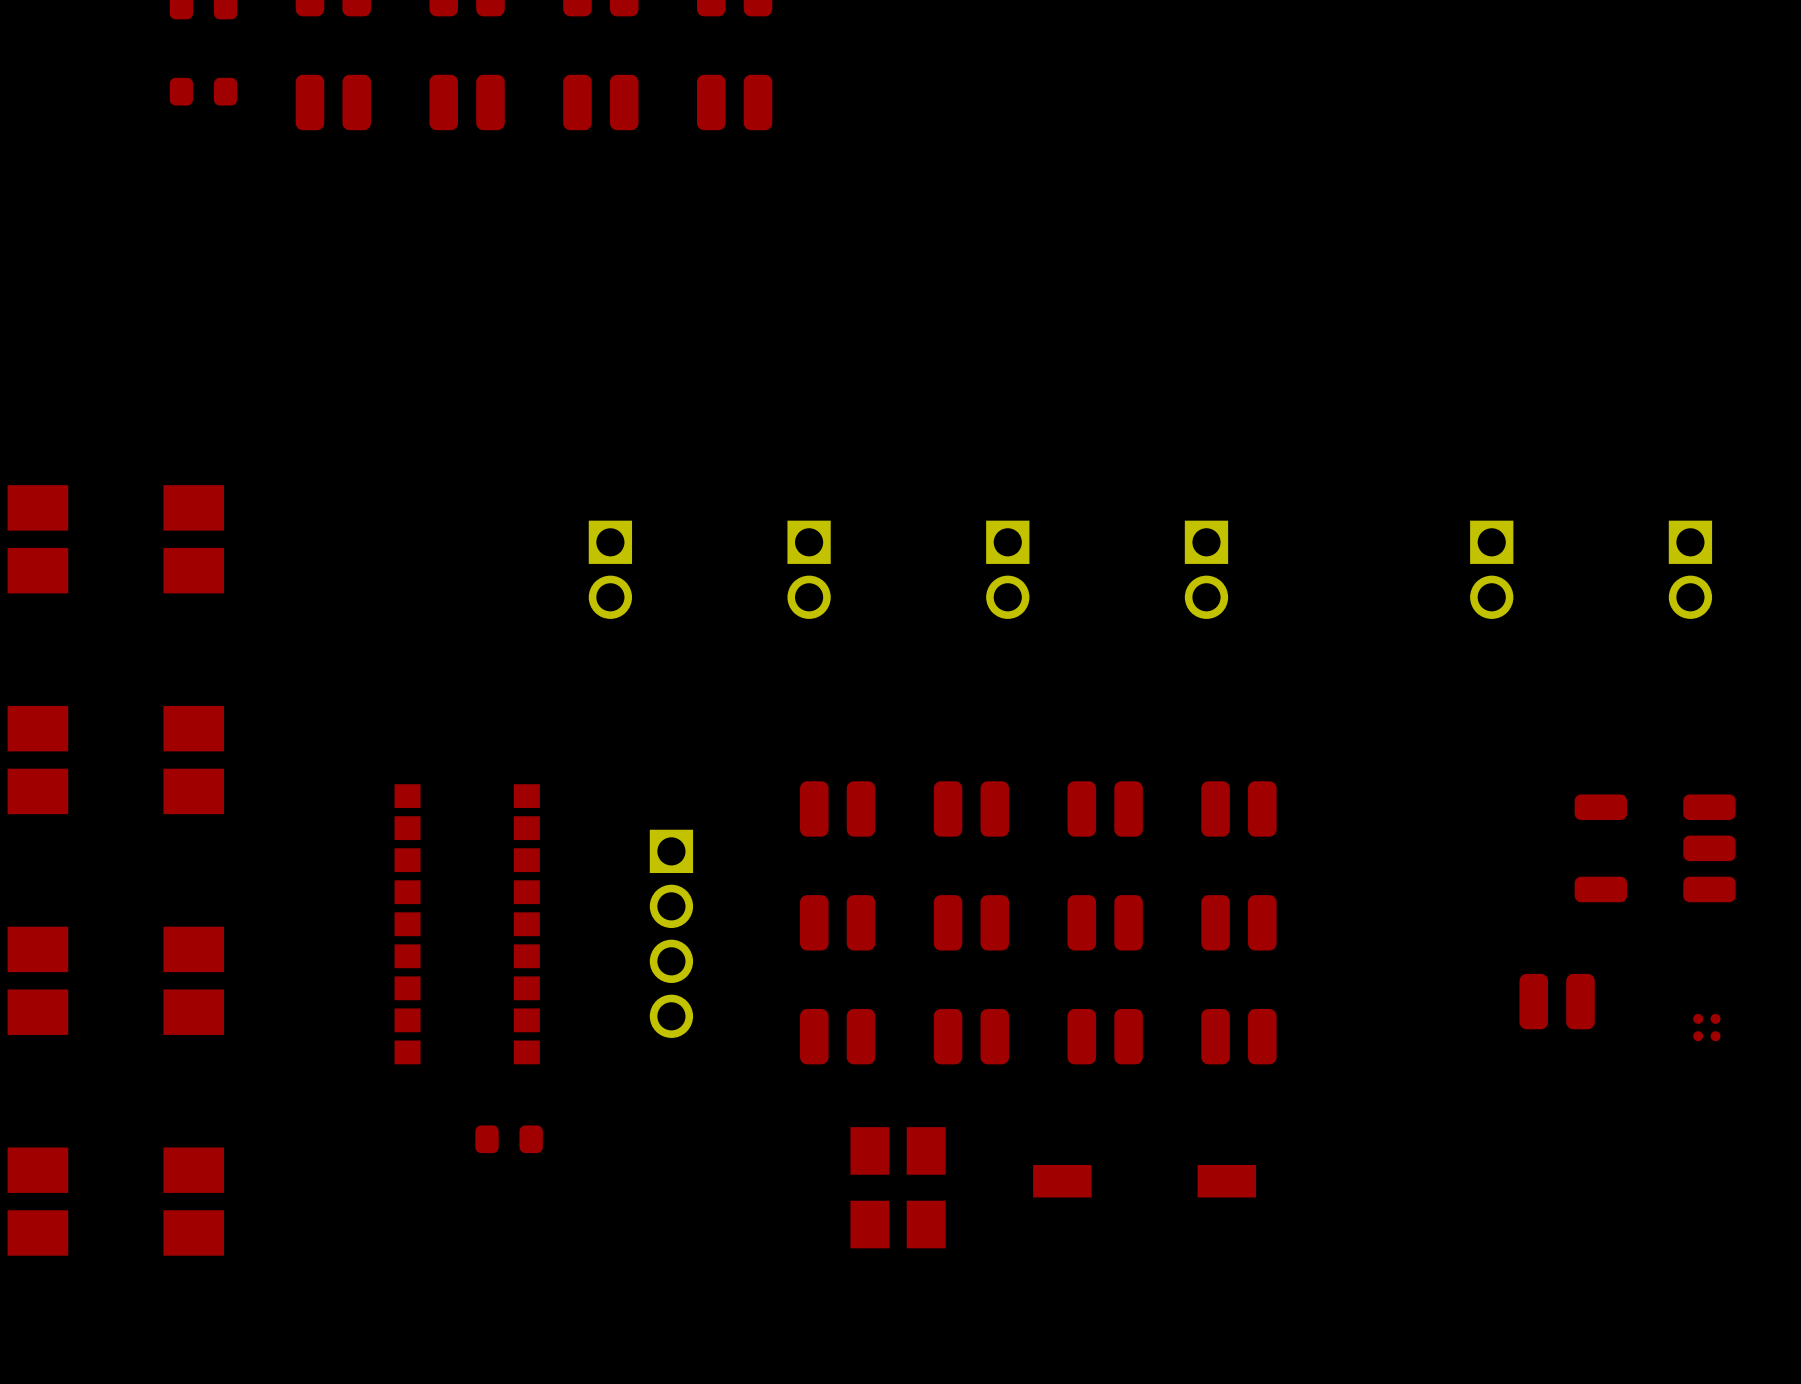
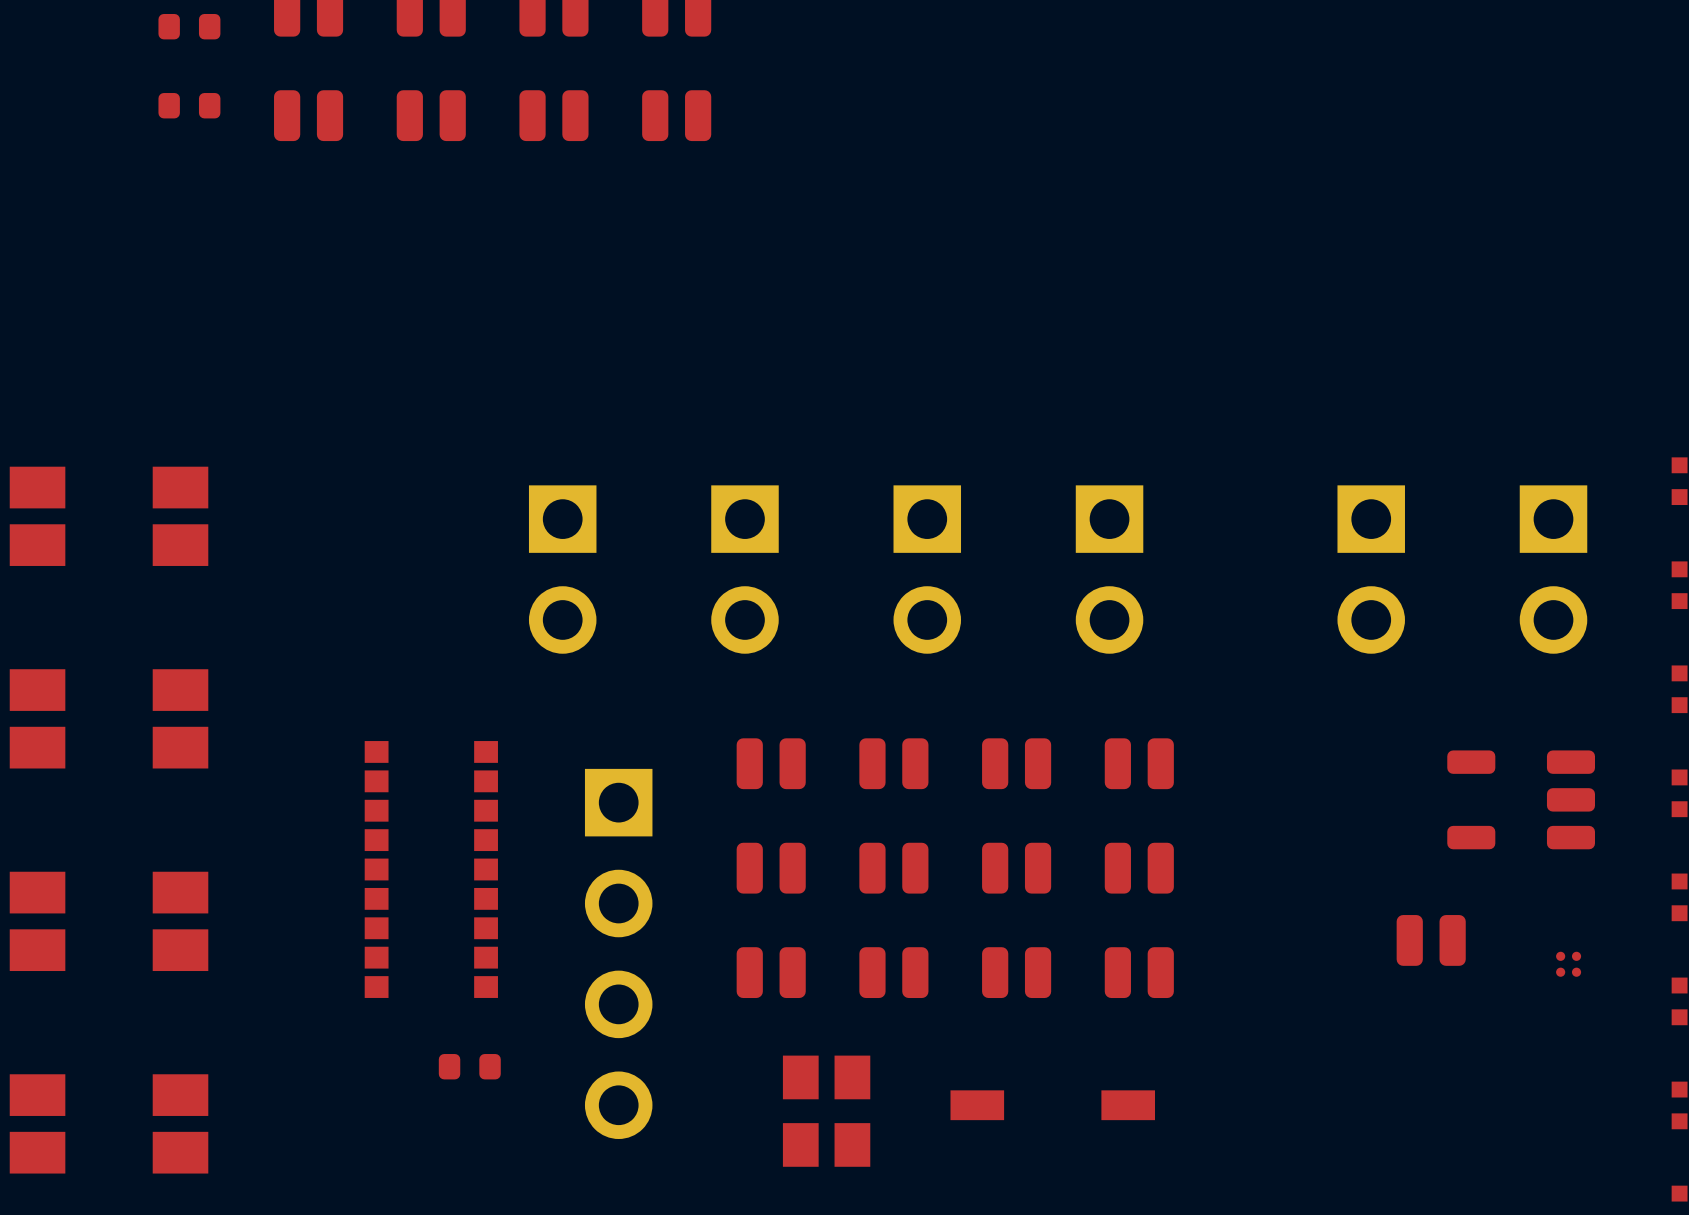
part footprint: [588, 520, 633, 619] -> [528, 485, 597, 654]
part footprint: [787, 520, 831, 619] -> [711, 485, 779, 654]
part footprint: [986, 520, 1030, 619] -> [893, 485, 962, 654]
part footprint: [1184, 520, 1229, 619] -> [1075, 485, 1144, 654]
part footprint: [1470, 520, 1514, 619] -> [1337, 485, 1405, 654]
part footprint: [1668, 520, 1713, 619] -> [1519, 485, 1588, 654]
part: (671, 933) -> none
part: none -> (618, 953)

